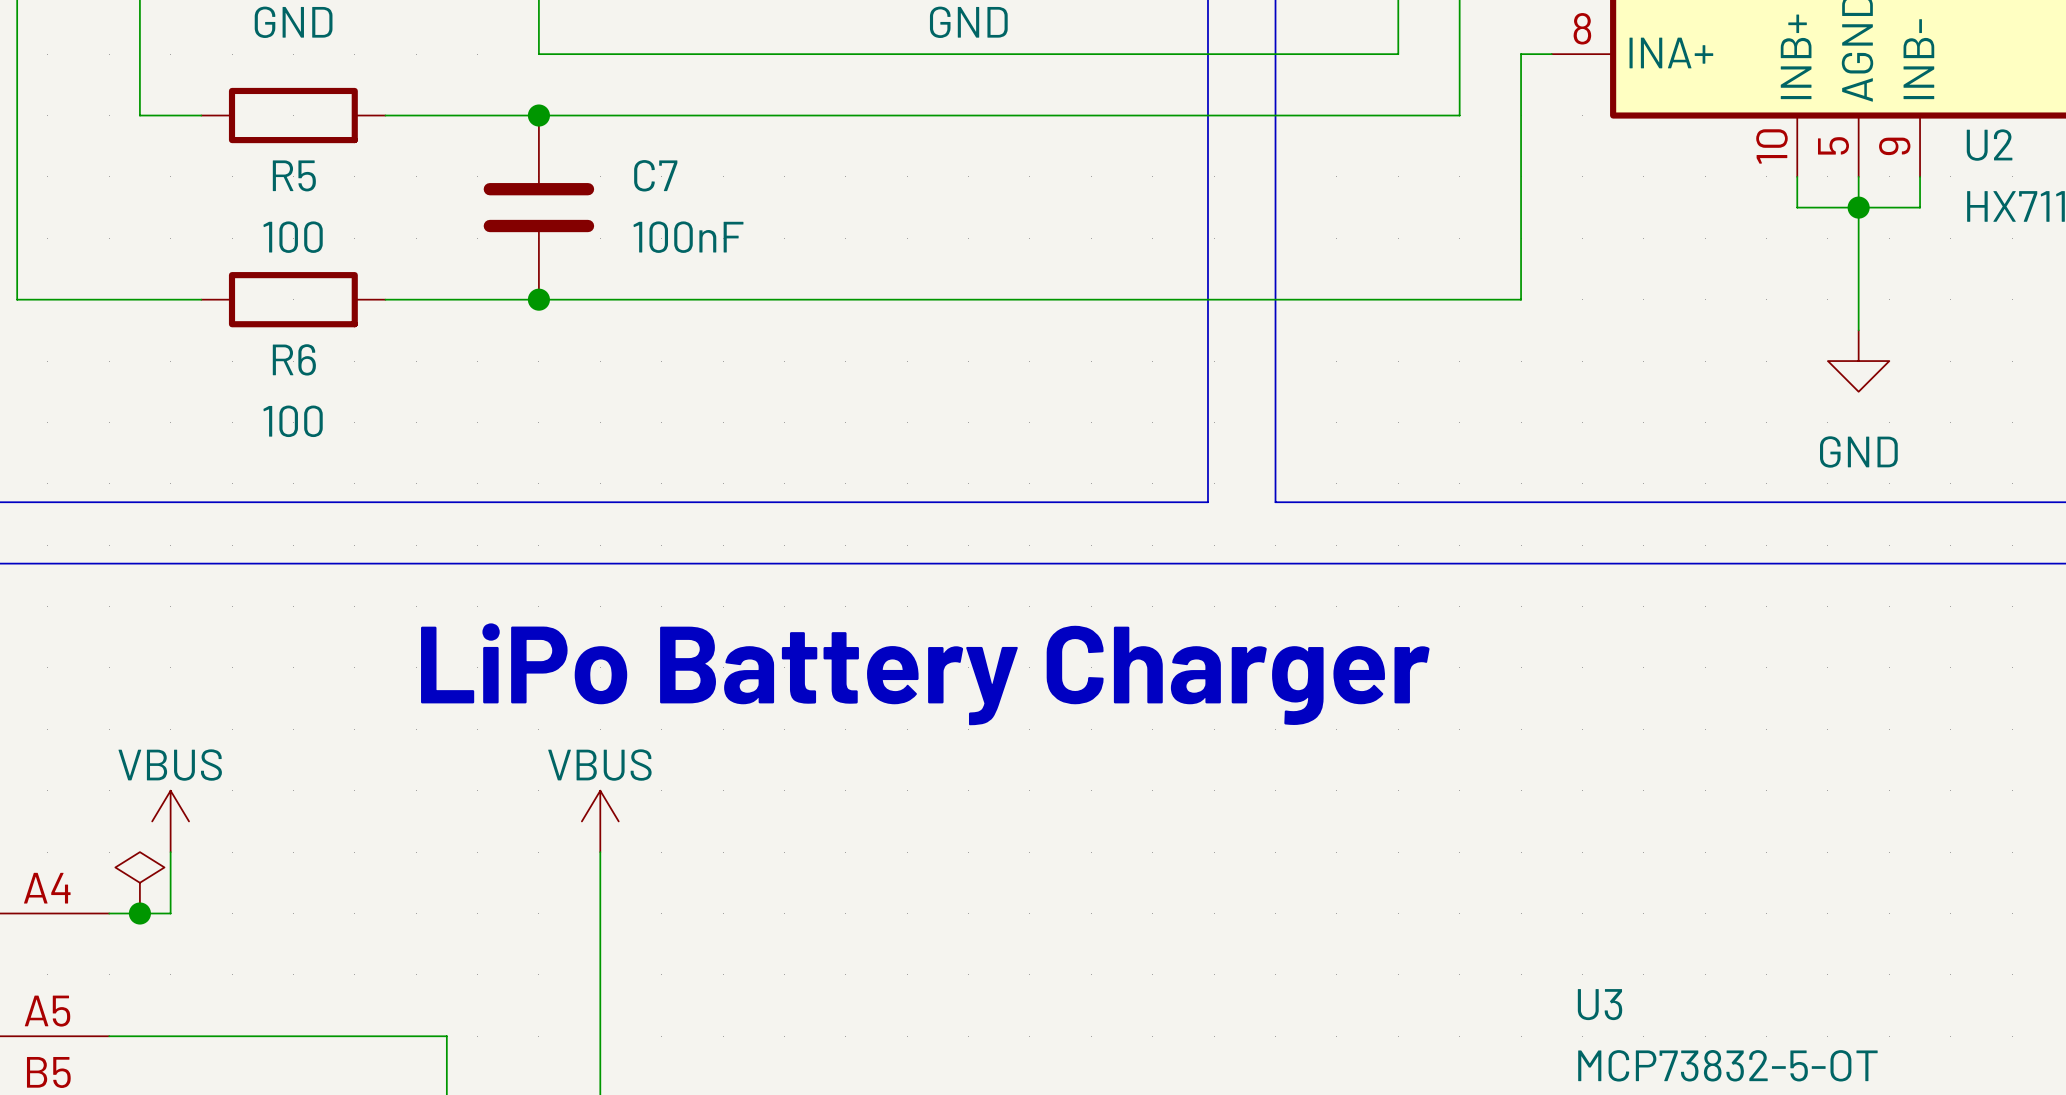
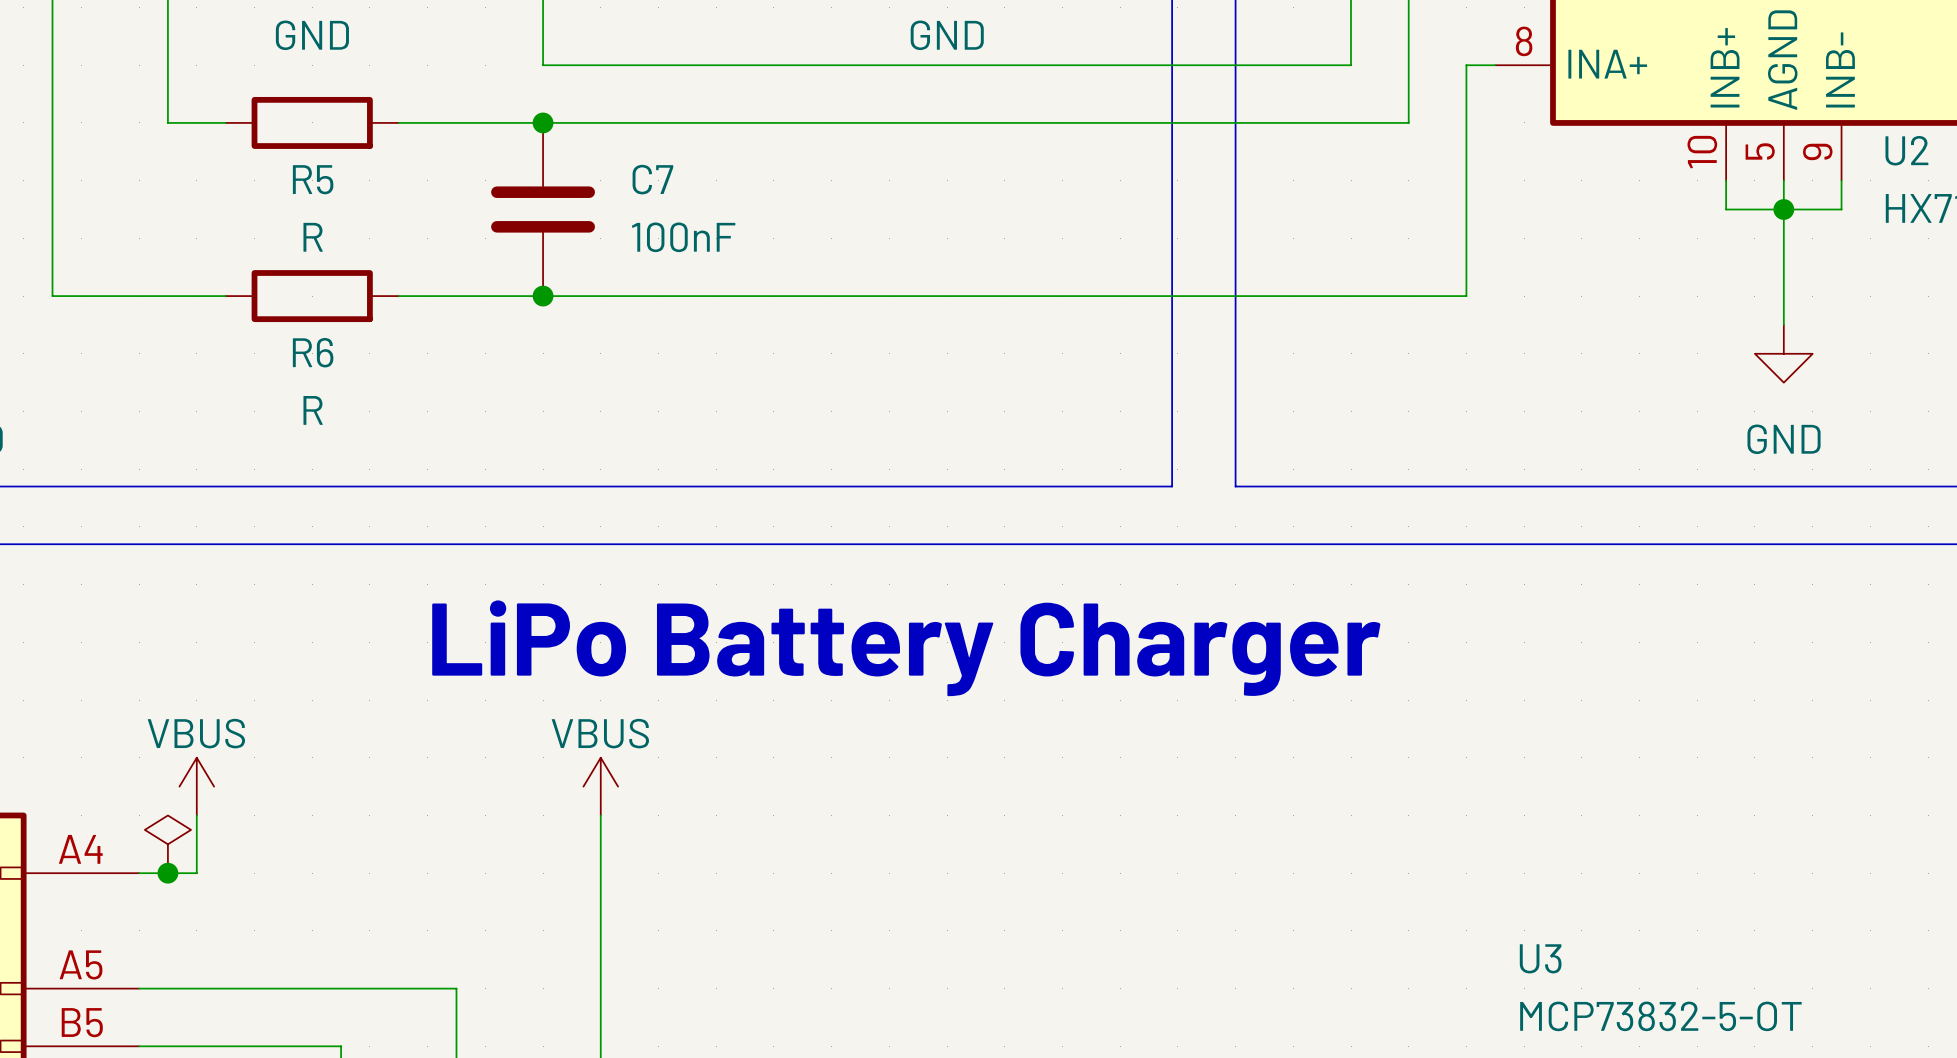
R5 value: 100 (293, 237) -> R (313, 237)
R6 value: 100 (293, 421) -> R (313, 410)

